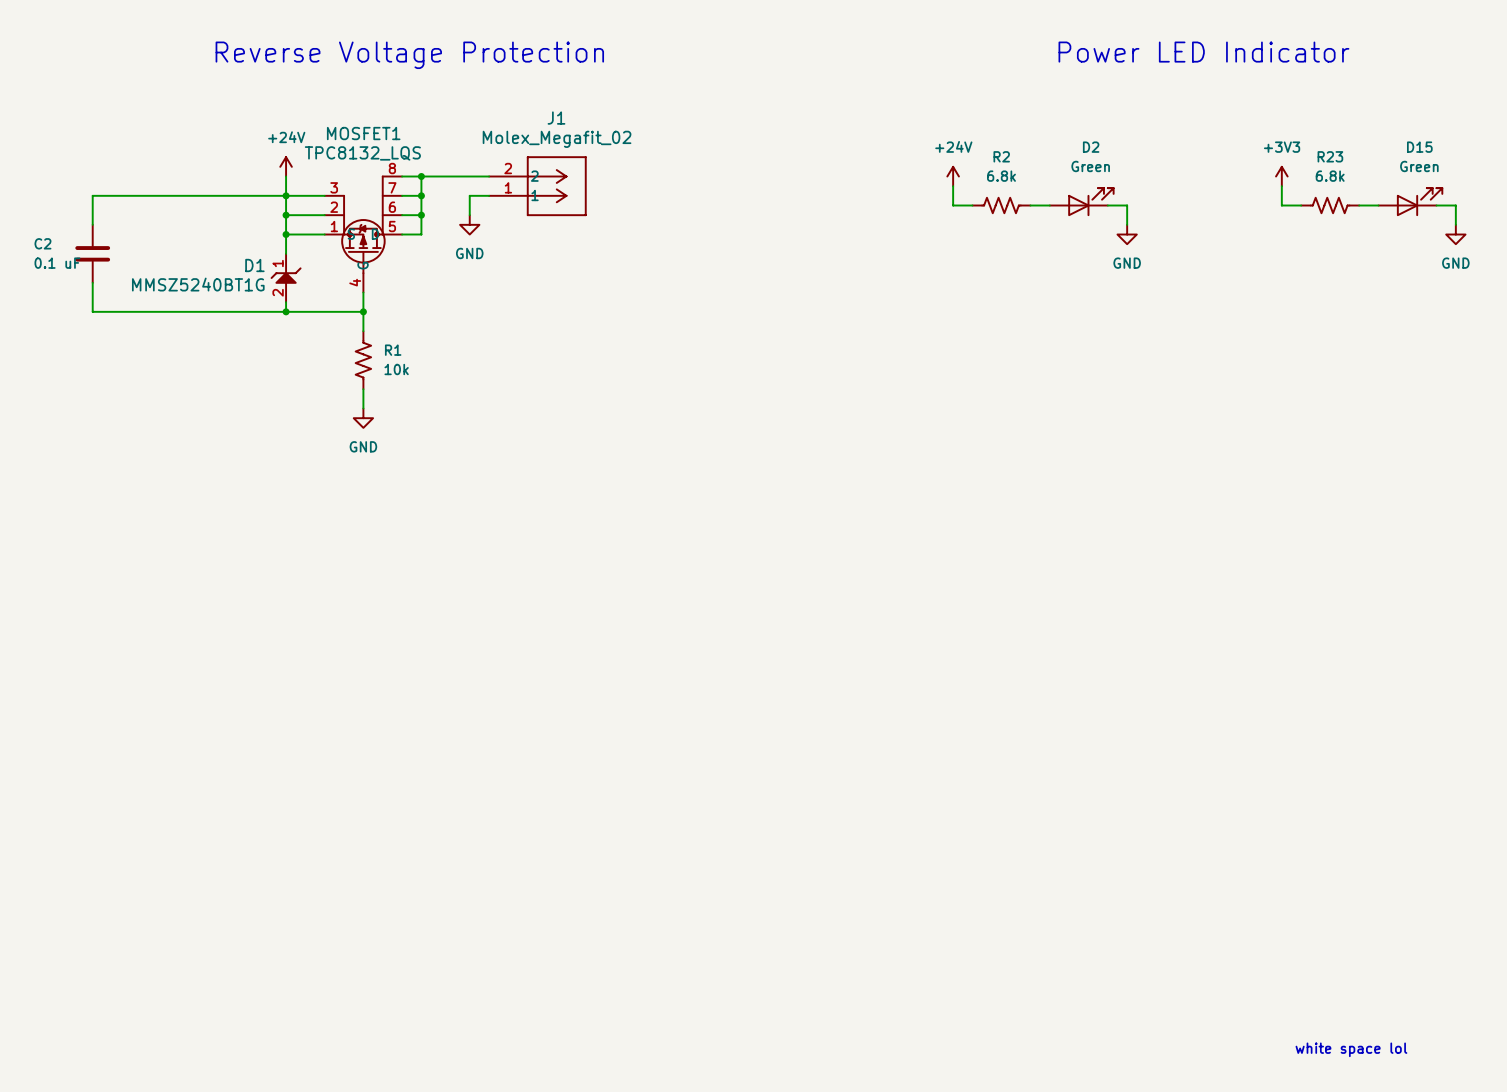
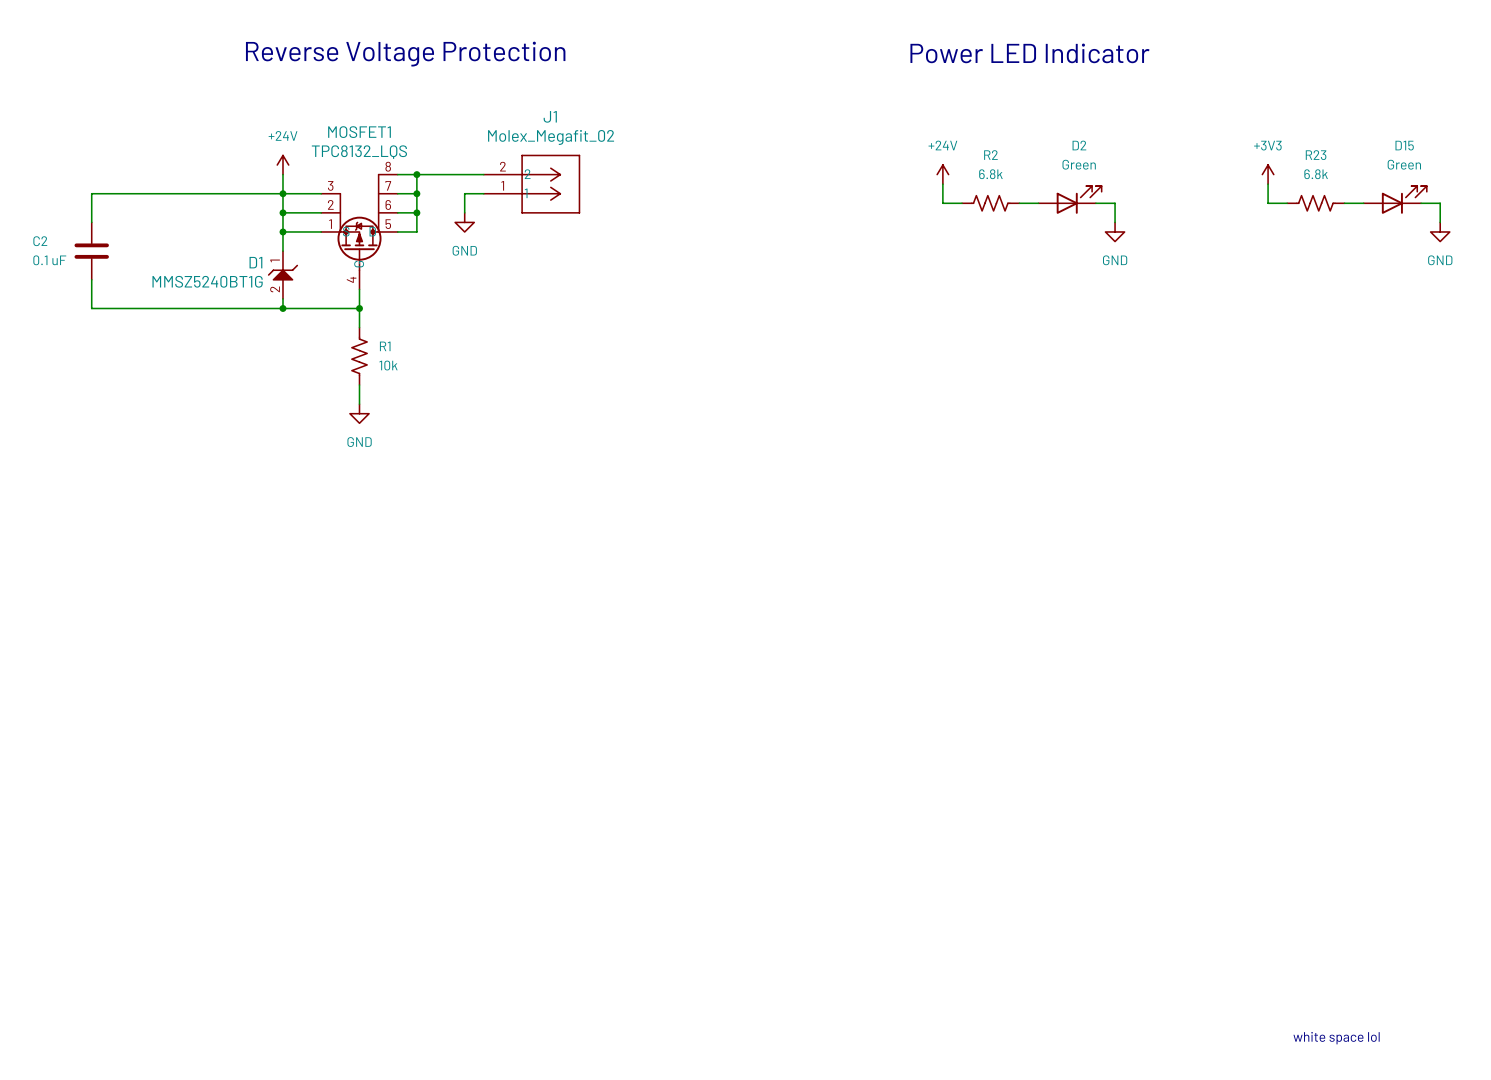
text position: Power LED Indicator (1203, 52) -> Power LED Indicator (1029, 53)

